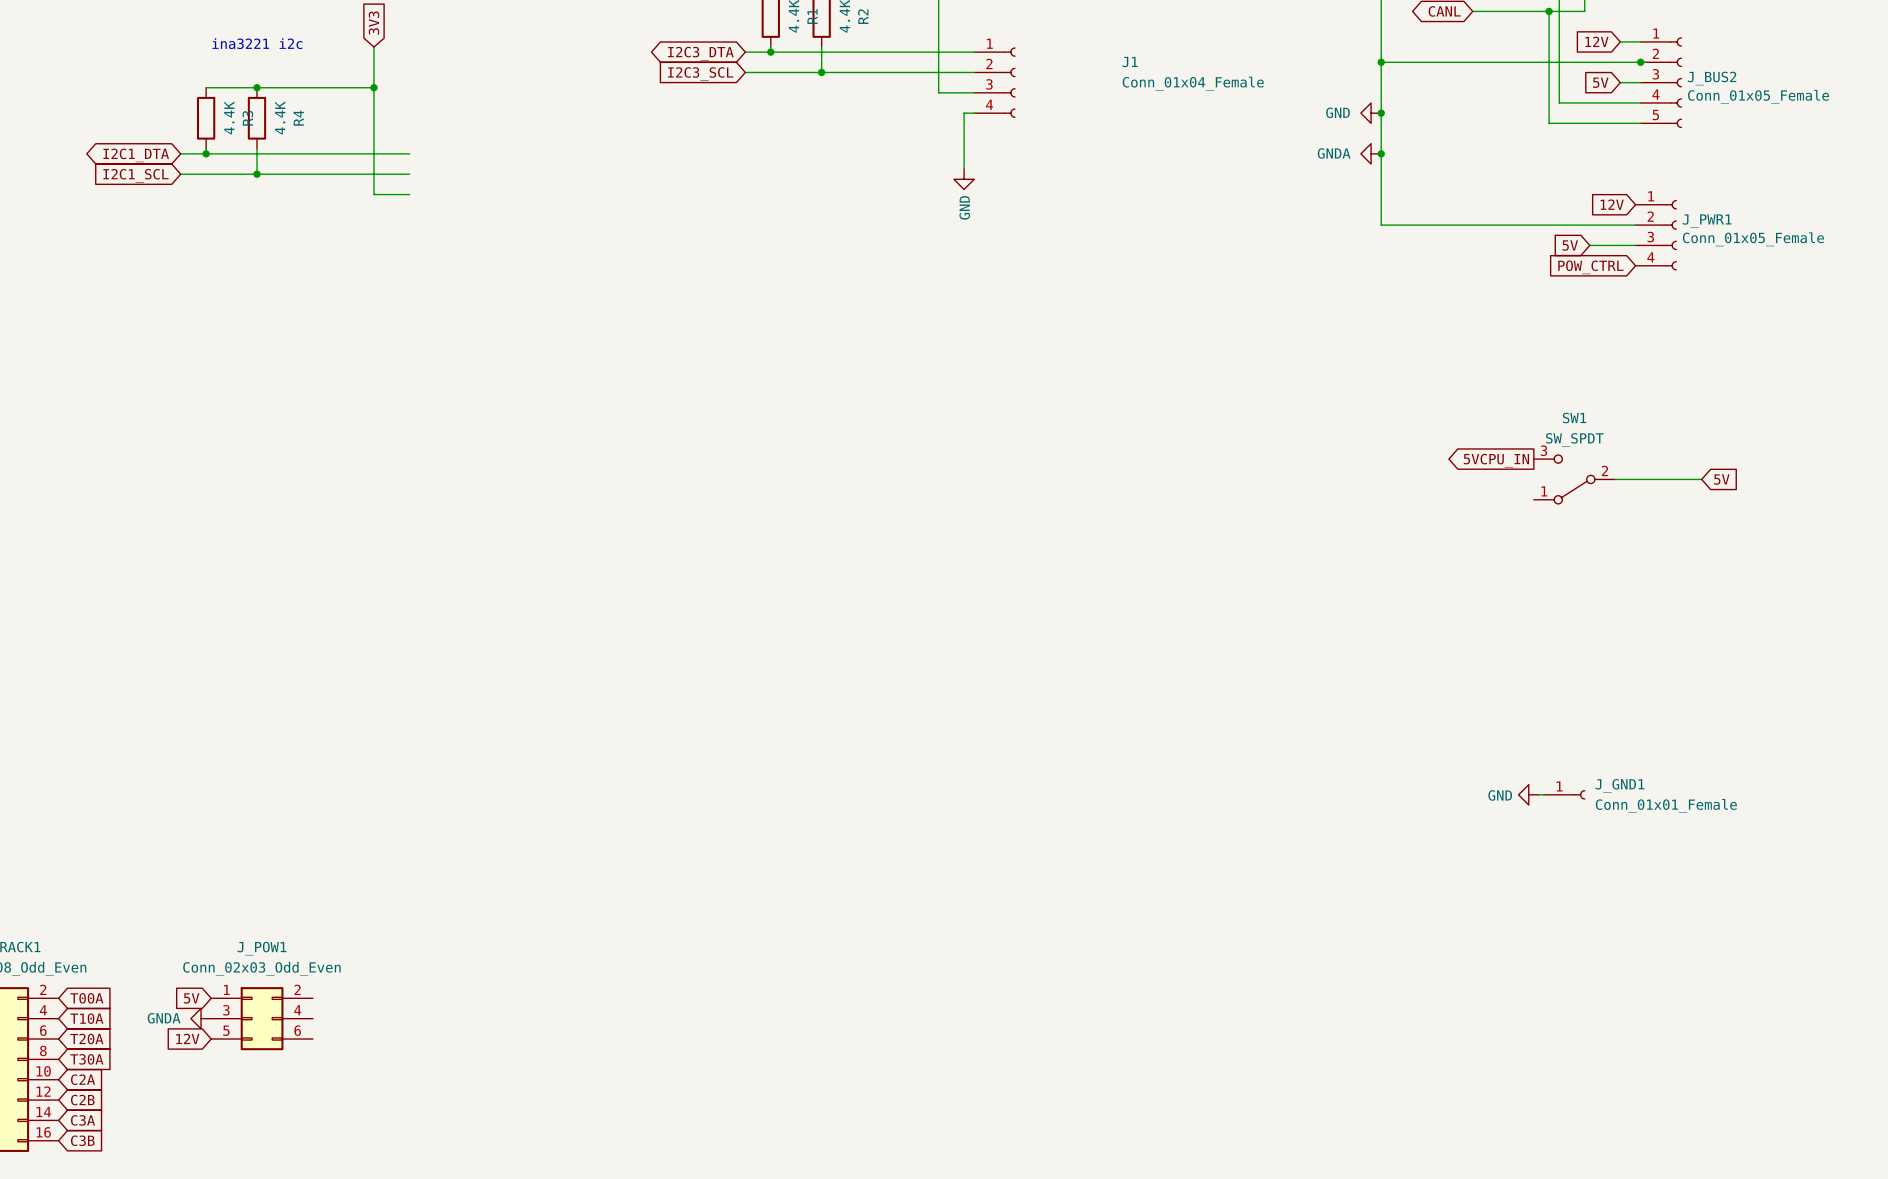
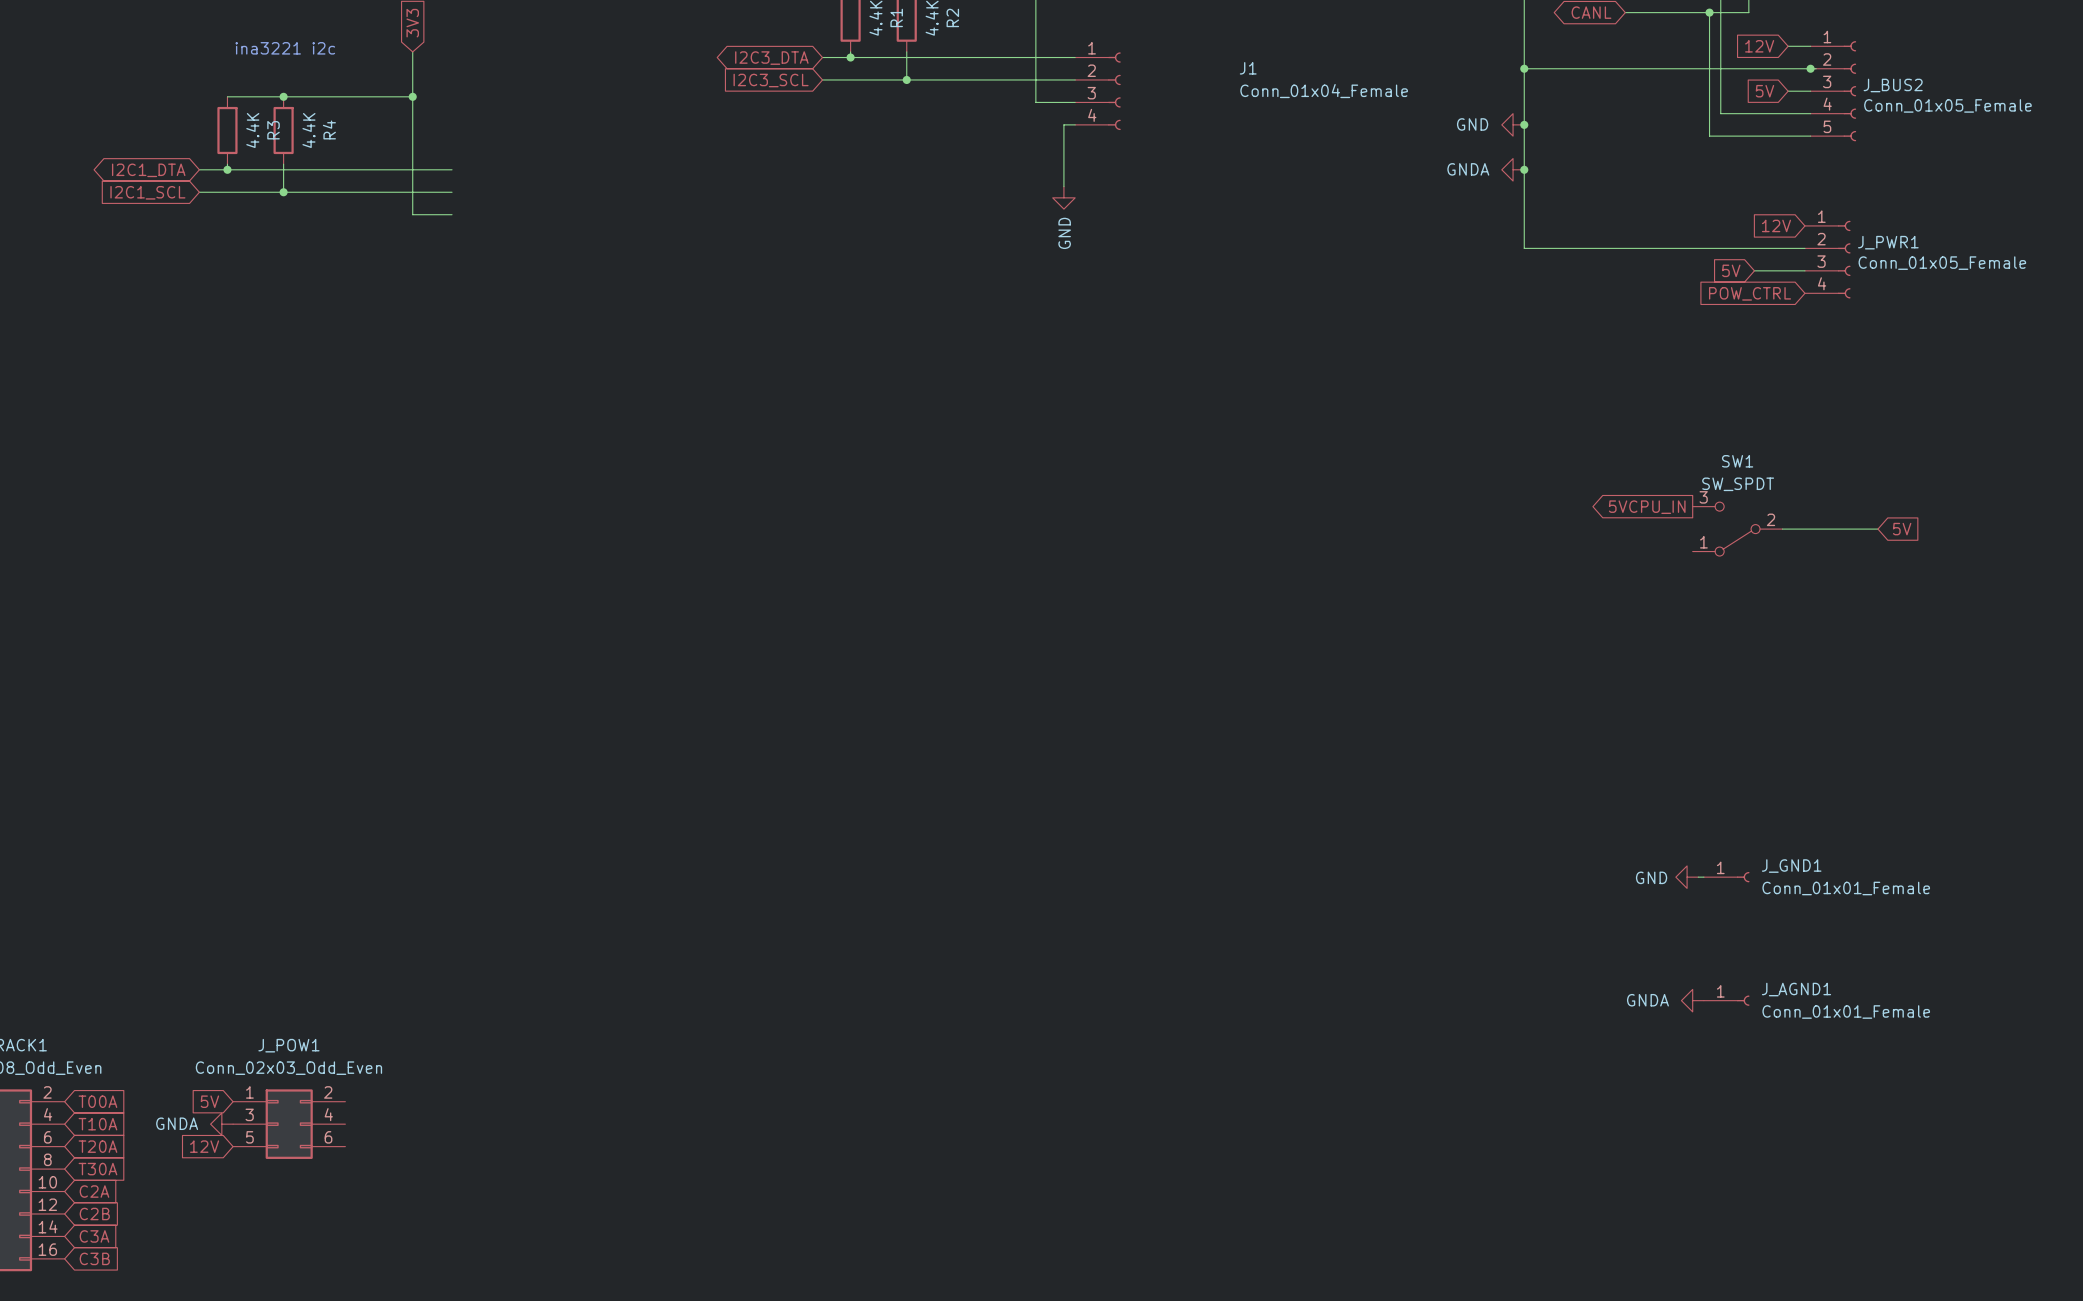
power symbol: none -> GNDA (1692, 1000)
J_AGND1: none -> Conn_01x01_Female (1726, 1000)

